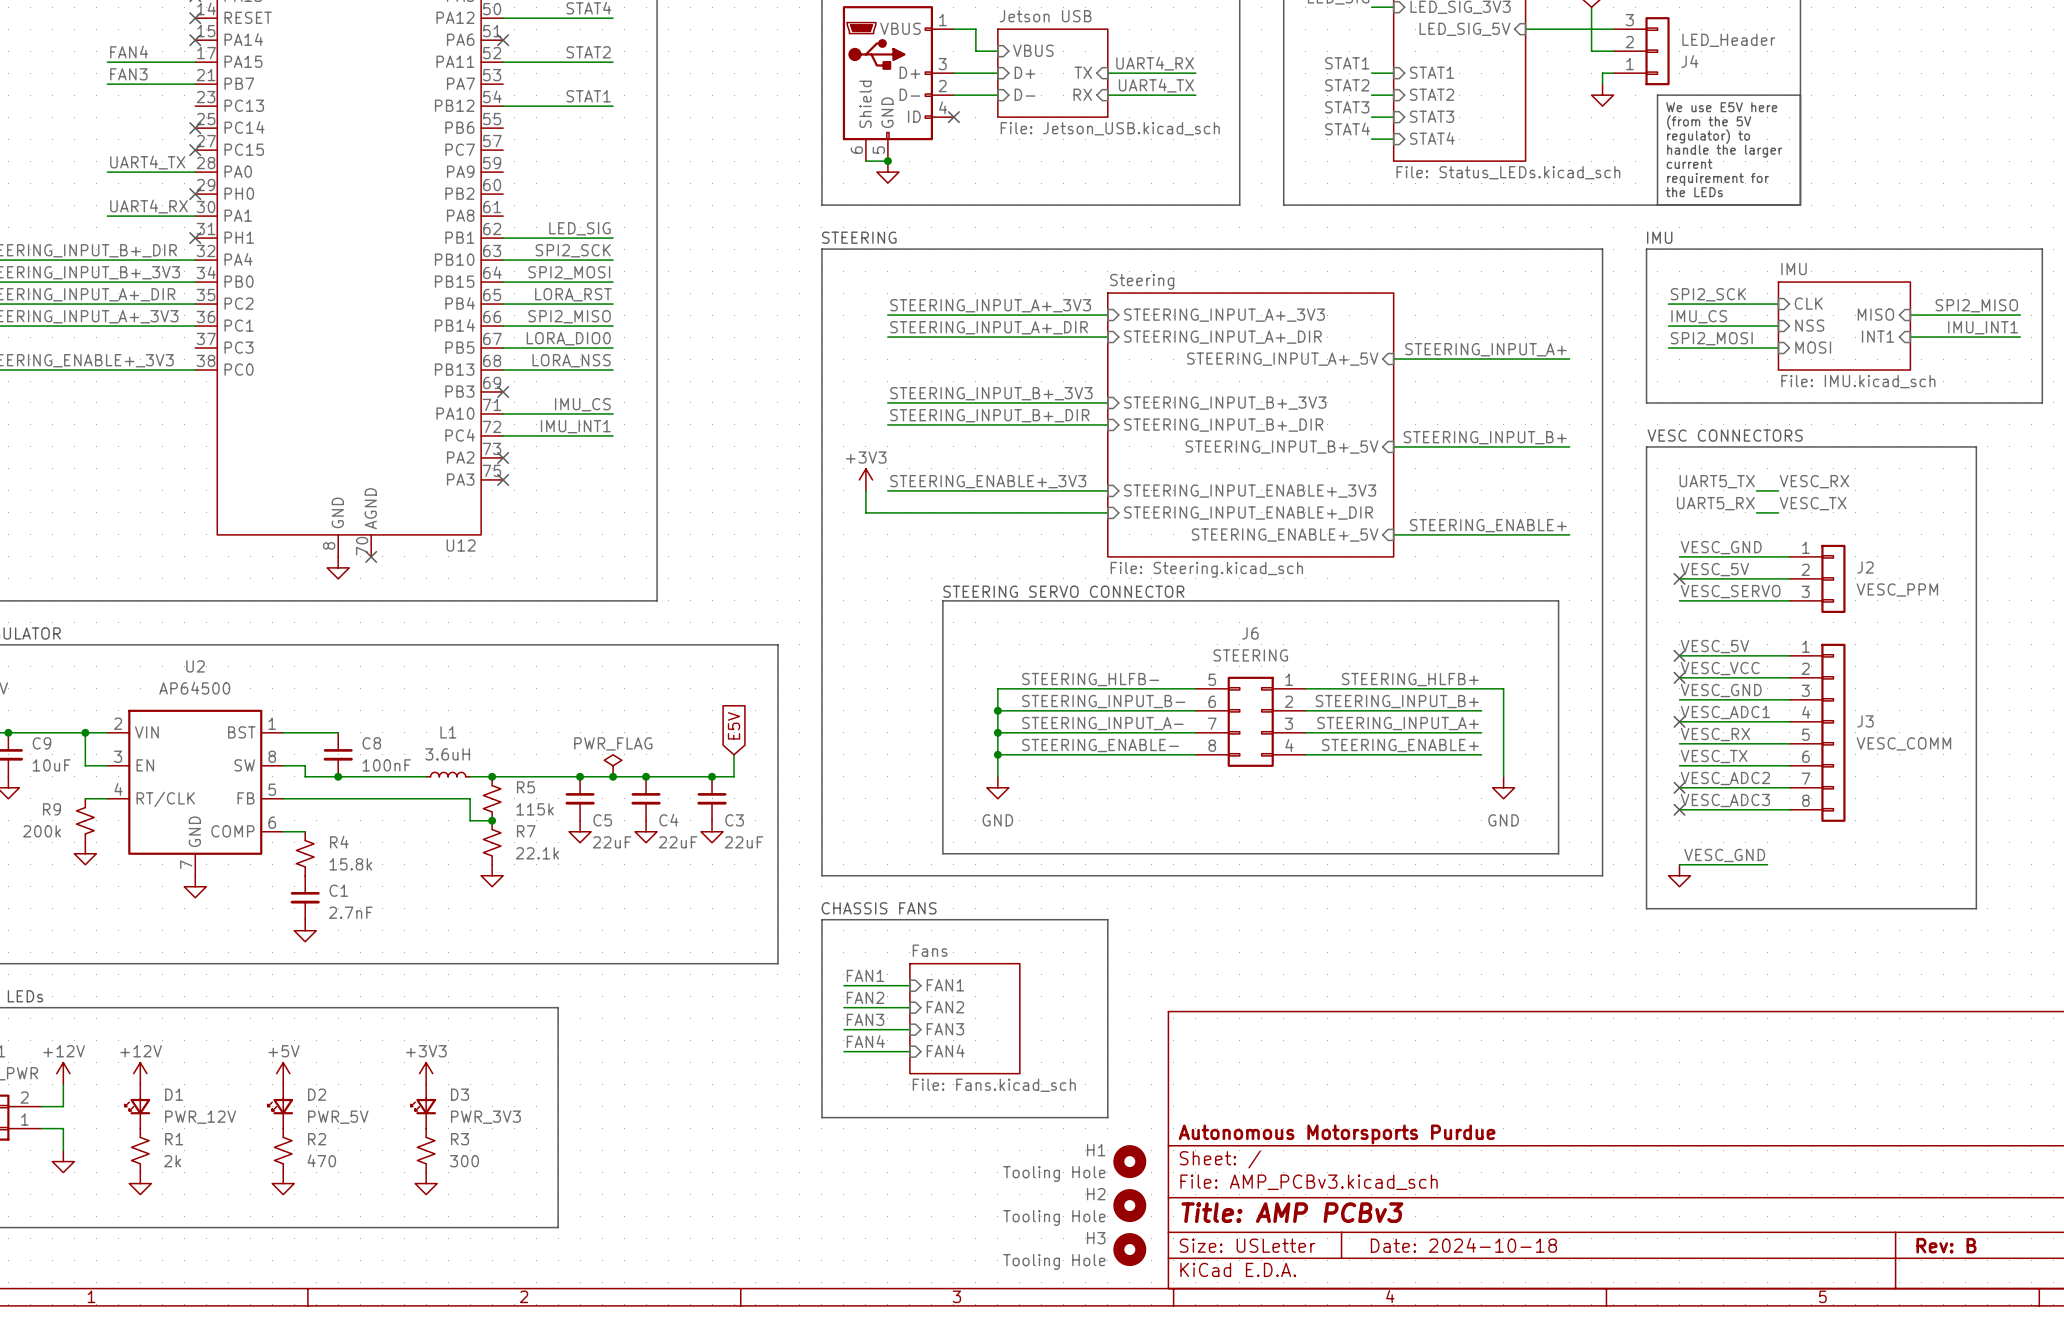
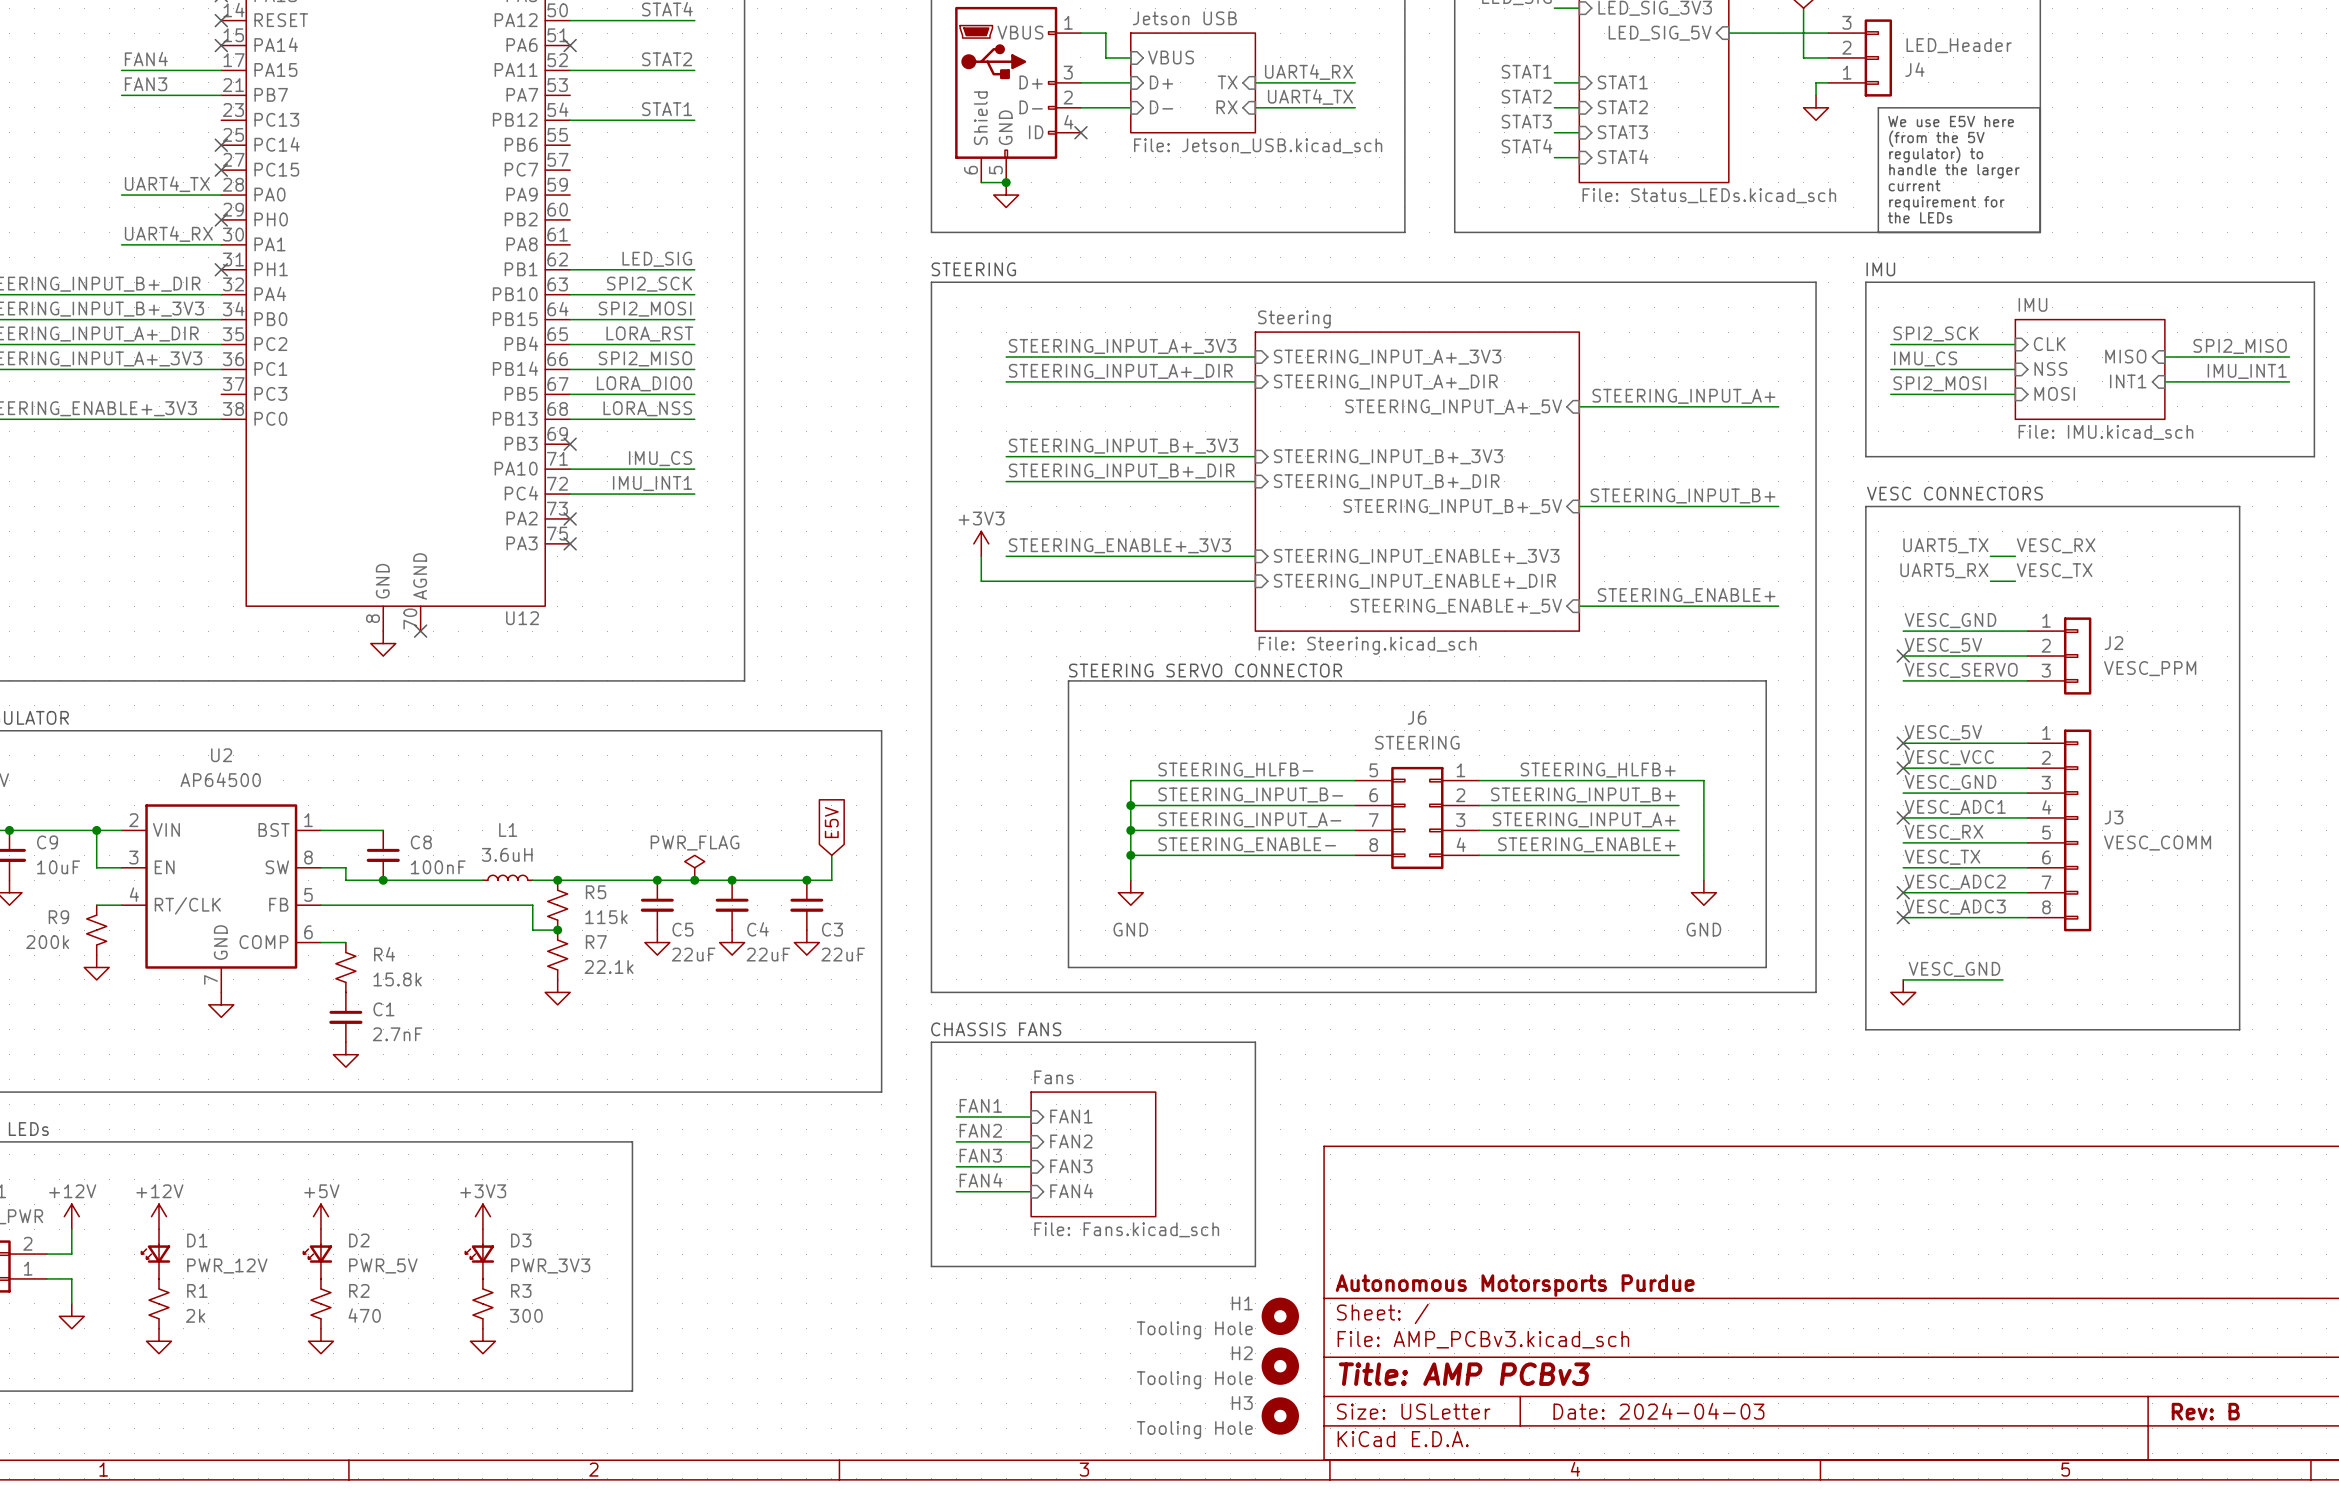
title block: Date: 2024-10-18 (1463, 1245) -> Date: 2024-04-03 (1658, 1411)

